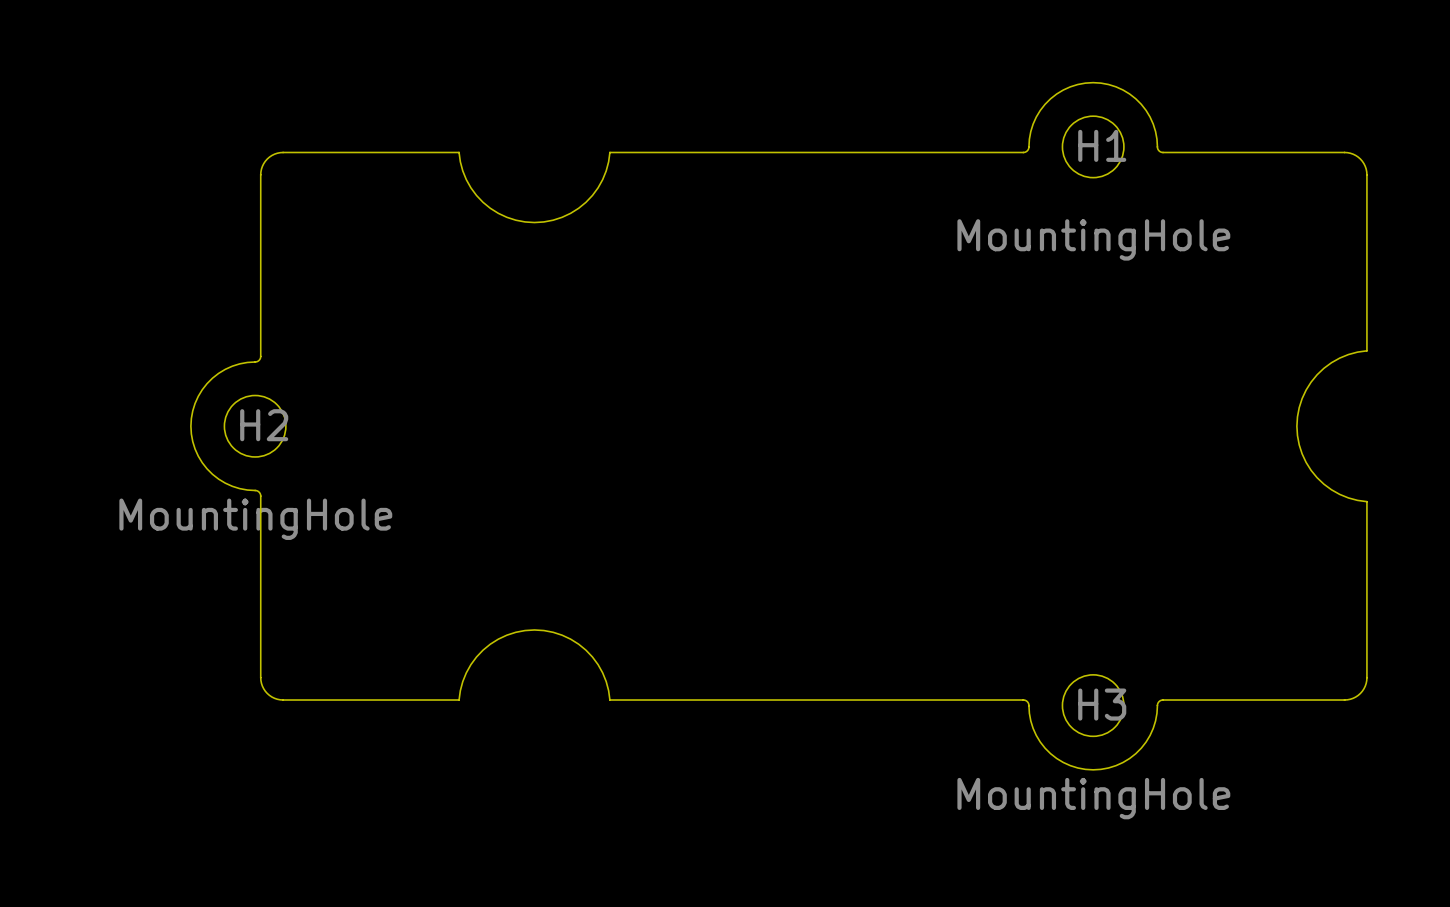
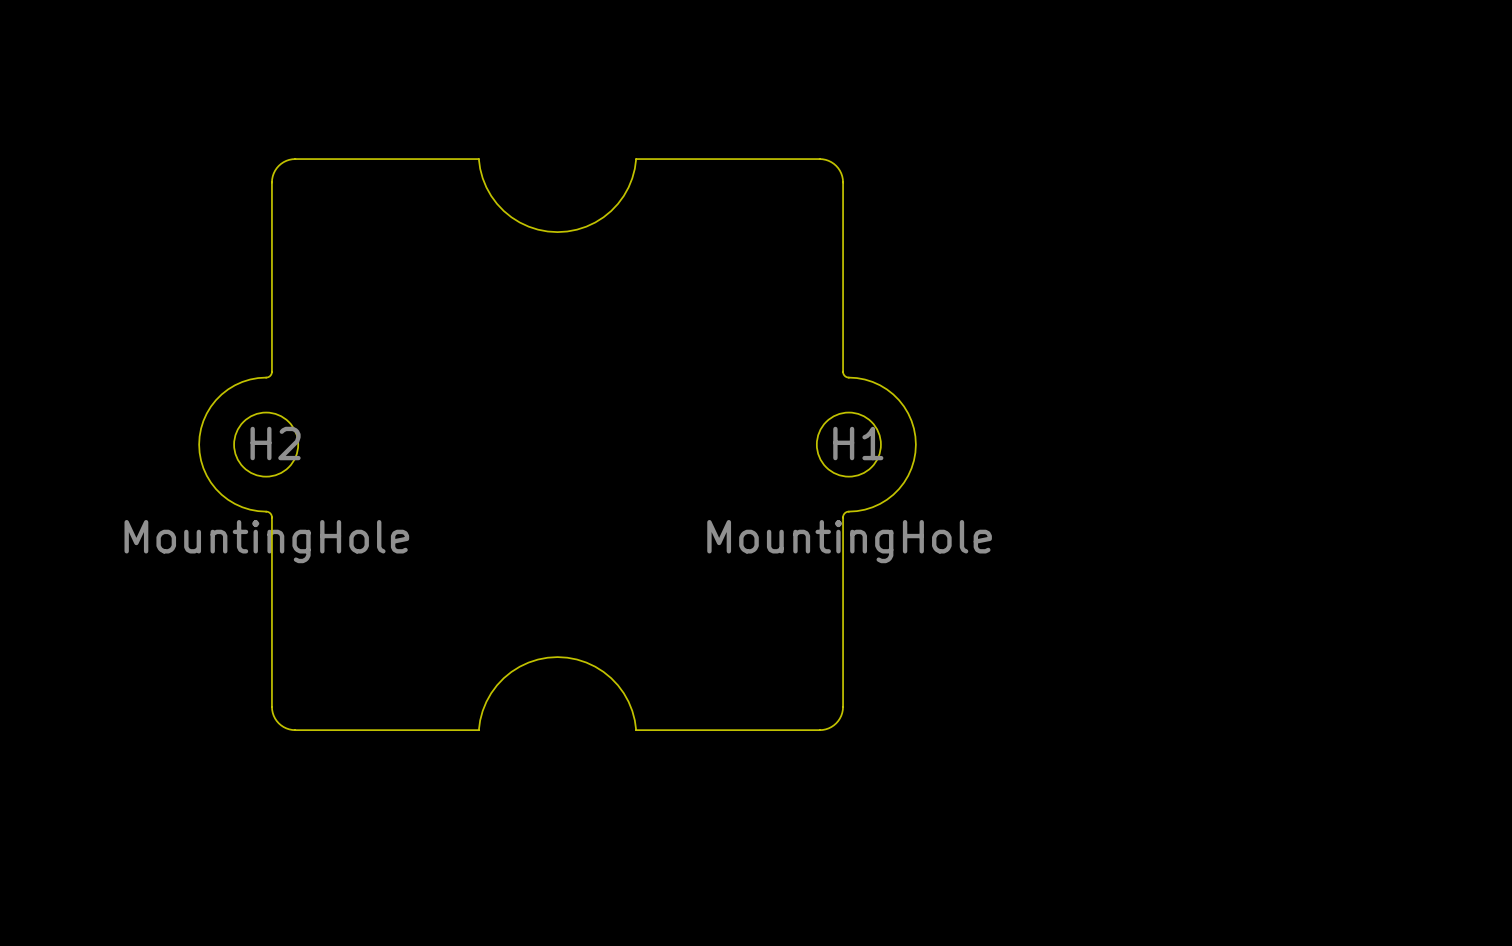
H1 position: (1093, 146) -> (848, 444)
board edge: (785, 152) (1024, 152) (1028, 148) (1033, 124) (1045, 104) (1063, 90) (1077, 84) (1093, 82) (1108, 84) (1123, 90) (1141, 104) (1153, 124) (1157, 148) (1161, 152) (1347, 152) (1355, 155) (1362, 161) (1366, 174) (1366, 350) (1339, 358) (1317, 374) (1302, 398) (1296, 426) (1302, 453) (1317, 477) (1339, 494) (1366, 501) (1366, 677) (1365, 686) (1360, 693) (1353, 698) (1344, 700) (1161, 700) (1157, 704) (1153, 728) (1141, 748) (1123, 762) (1108, 767) (1093, 769) (1077, 767) (1063, 762) (1045, 748) (1033, 728) (1028, 704) (1024, 700) (785, 700) -> (819, 159) (828, 160) (836, 165) (842, 179) (843, 373) (847, 377) (872, 381) (893, 394) (904, 406) (911, 420) (915, 444) (911, 468) (904, 482) (893, 494) (872, 507) (847, 511) (843, 515) (842, 709) (836, 723) (828, 728) (819, 730)
H3: MountingHole (1093, 705) -> none

